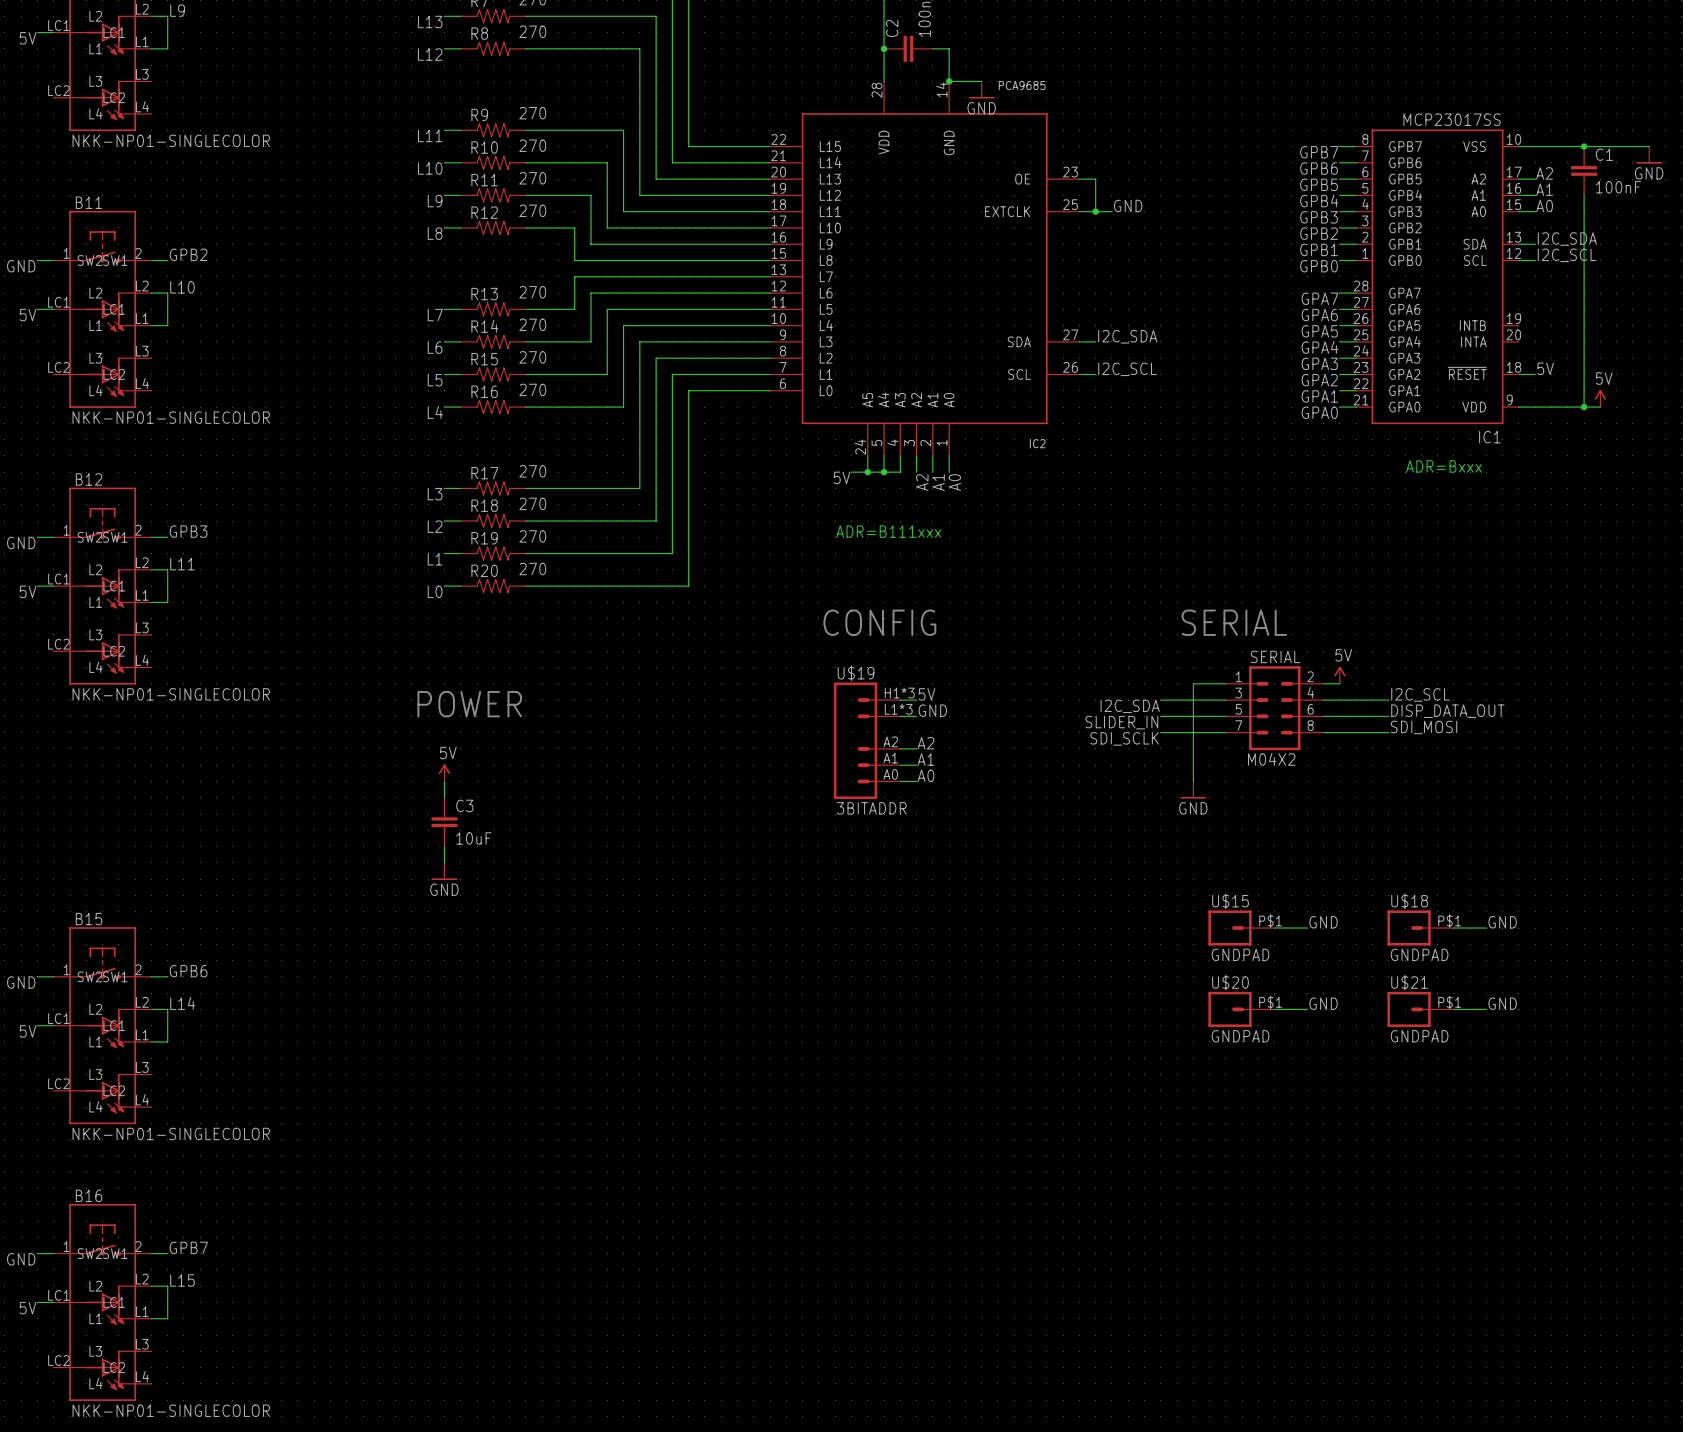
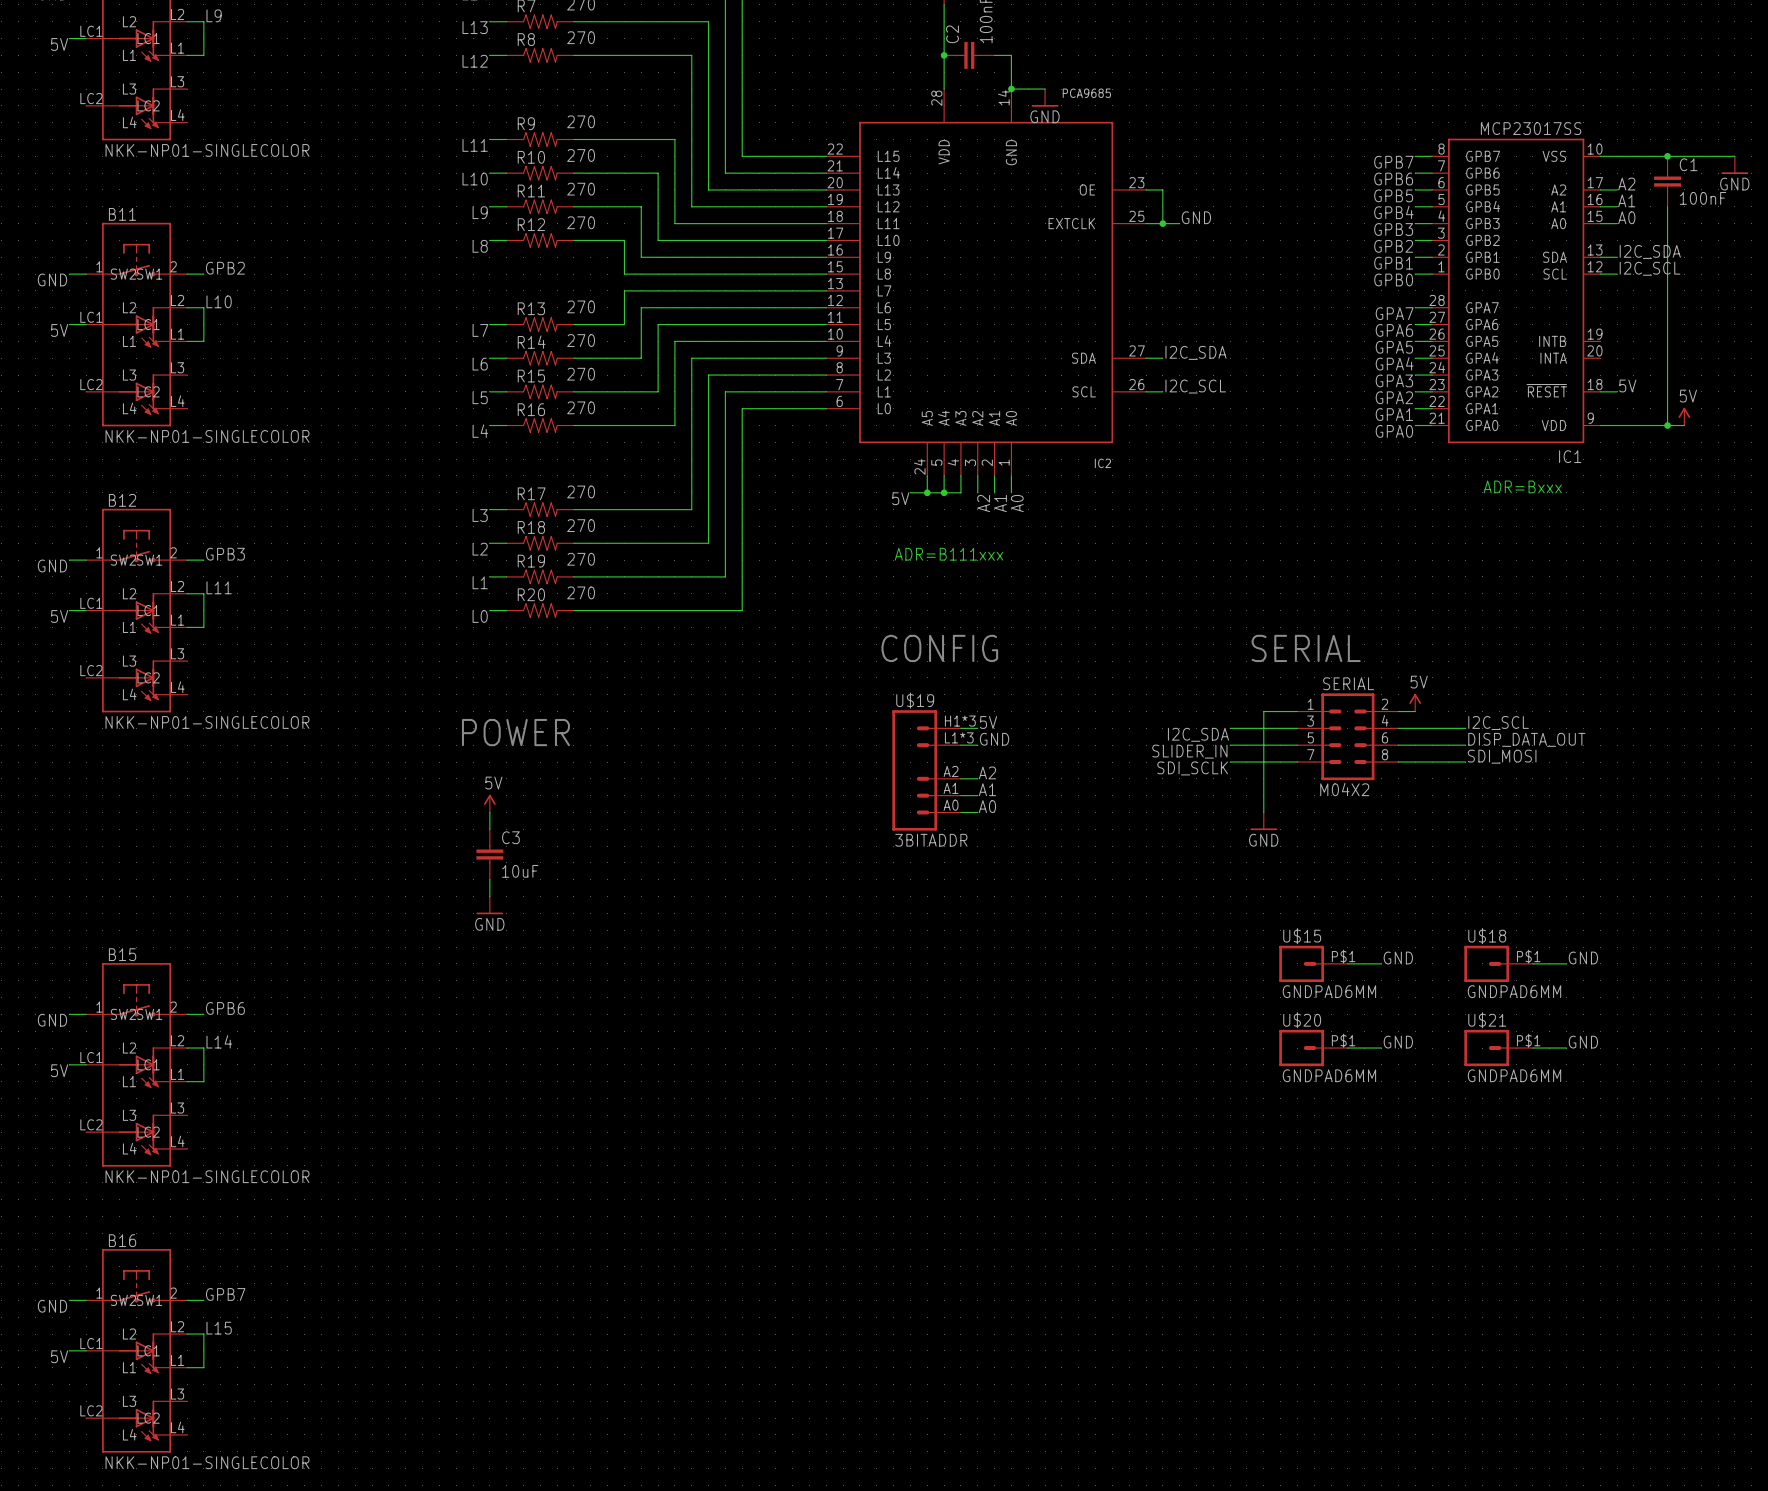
U$15 value: GNDPAD (1240, 954) -> GNDPAD6MM (1329, 991)
U$18 value: GNDPAD (1419, 954) -> GNDPAD6MM (1514, 991)
U$20 value: GNDPAD (1240, 1036) -> GNDPAD6MM (1329, 1075)
U$21 value: GNDPAD (1419, 1036) -> GNDPAD6MM (1514, 1075)

